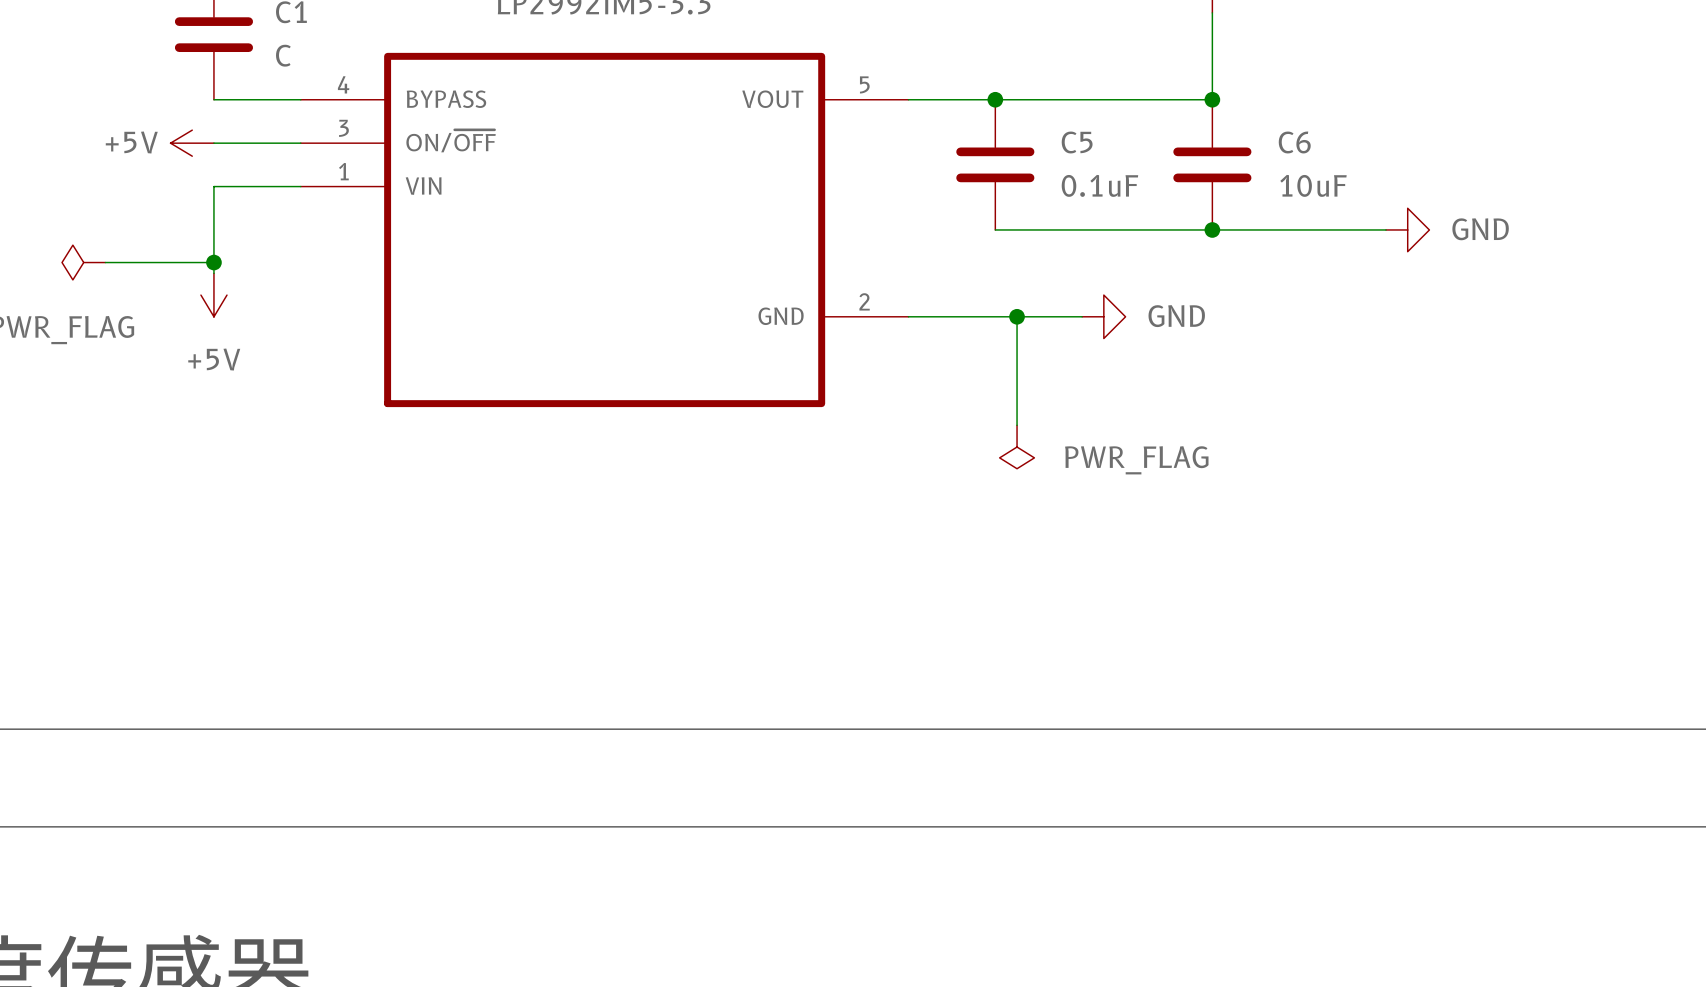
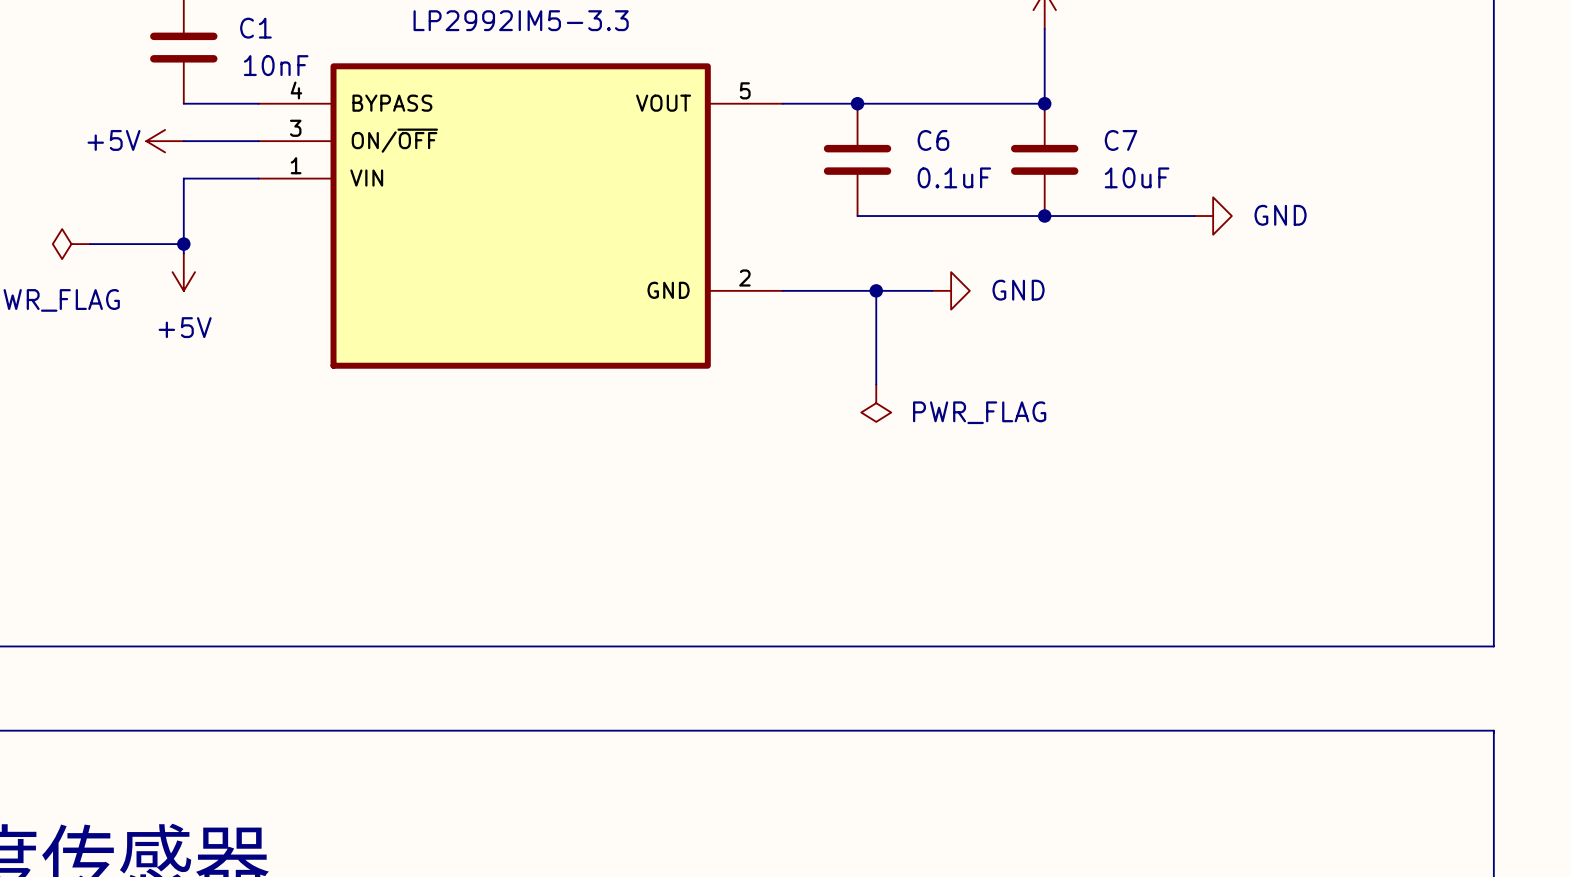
C1 value: C (283, 55) -> 10nF (276, 65)
C5 name: C5 (1077, 142) -> C6 (933, 140)
C6 name: C6 (1294, 142) -> C7 (1121, 140)

